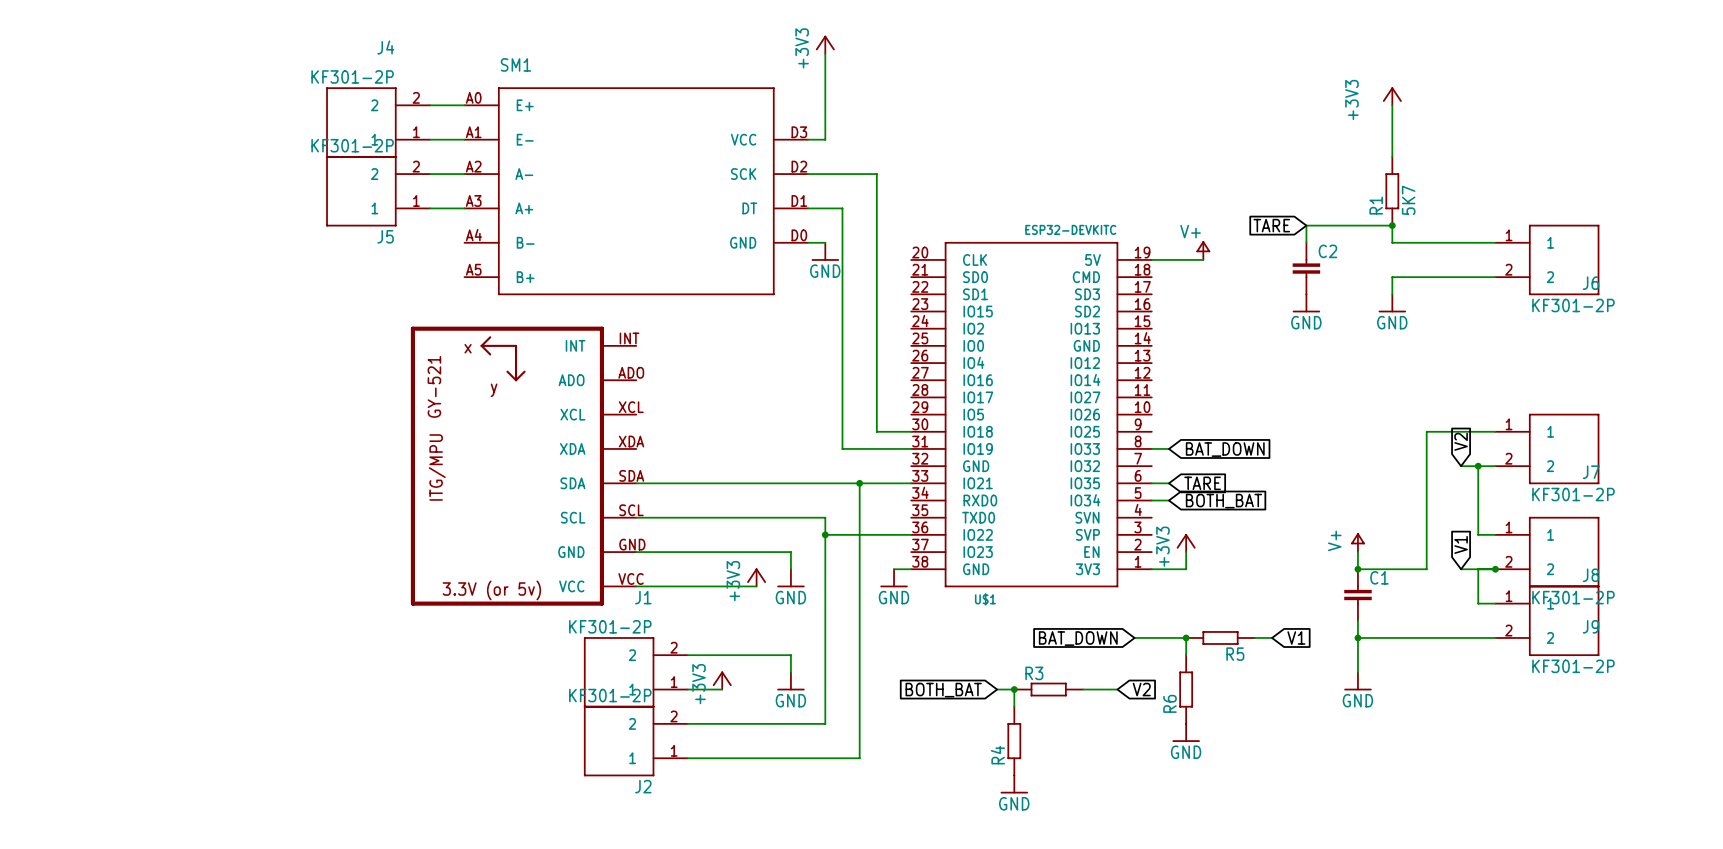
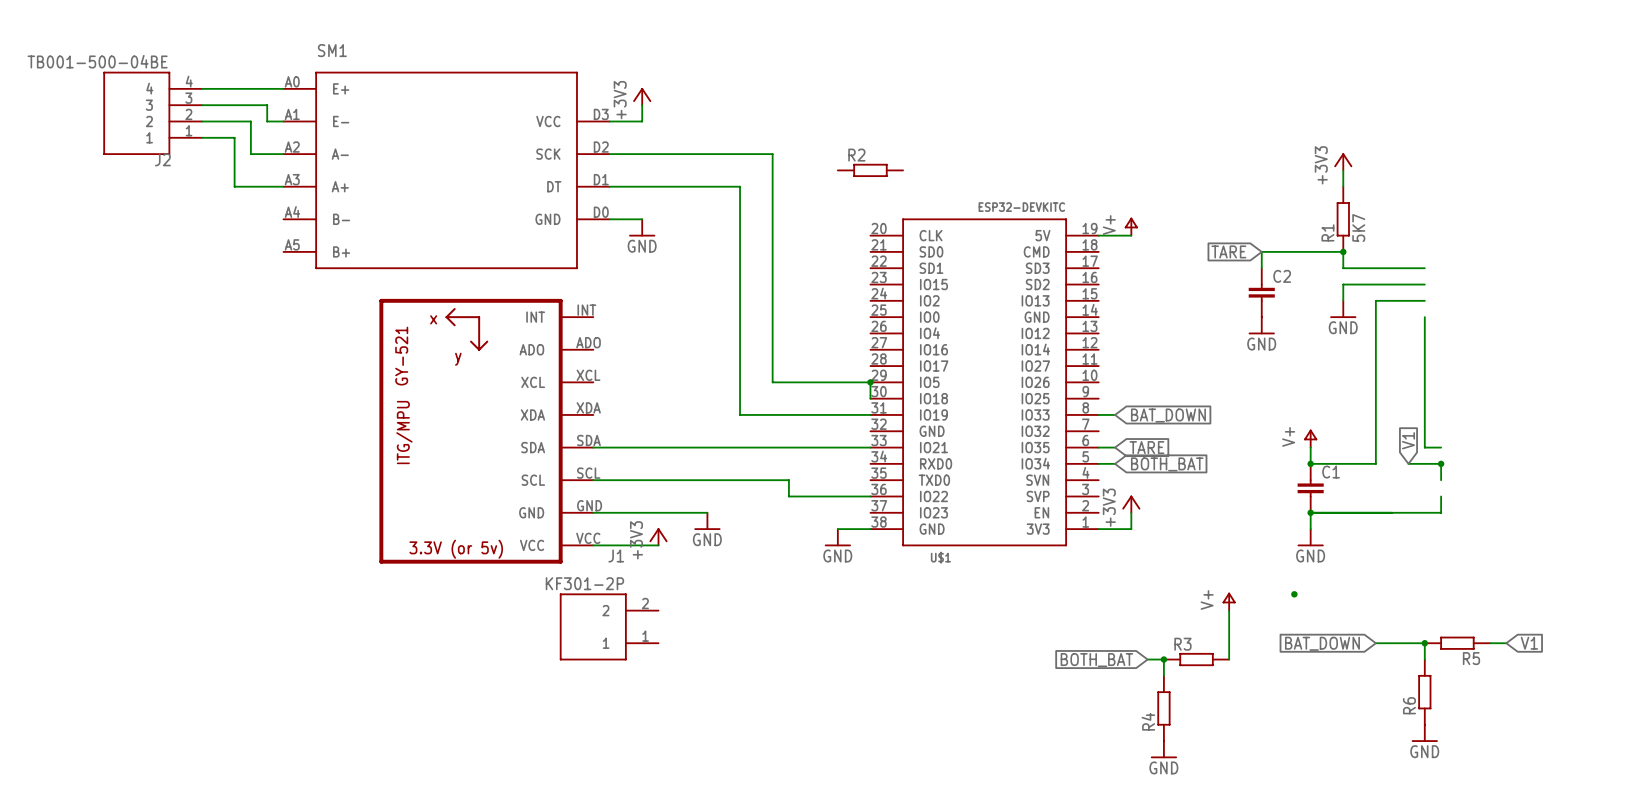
power symbol: +3V3 (825, 44) -> none
wire: (825, 53) (825, 139) (808, 139) -> none
power symbol position: +3V3 (1392, 96) -> +3V3 (1343, 161)
power symbol text position: +3V3 (1351, 99) -> +3V3 (1321, 165)
wire: none -> (201, 88) (283, 88)
wire: (430, 105) (464, 105) -> none
wire: (1392, 105) (1392, 156) -> none
power symbol: none -> +3V3 (642, 96)
wire: none -> (201, 105) (267, 105) (267, 121) (283, 121)
J4: KF301-2P (378, 122) -> none
wire: none -> (642, 105) (642, 121) (609, 121)
wire: none -> (201, 121) (250, 121) (250, 154) (283, 154)
wire: (430, 139) (464, 139) -> none
wire: none -> (201, 137) (234, 137) (234, 186) (283, 186)
wire: (430, 174) (464, 174) -> none
wire: (808, 174) (876, 174) (876, 431) (911, 431) -> (609, 154) (772, 154) (772, 382) (870, 382) (870, 398)
J5: KF301-2P (378, 191) -> none
SM1 position: (636, 191) -> (446, 170)
R2: none -> (870, 170)
R1 position: (1392, 191) -> (1343, 219)
wire: none -> (1343, 170) (1343, 186)
wire: (430, 208) (464, 208) -> none
wire: (808, 208) (842, 208) (842, 448) -> (609, 186) (740, 186) (740, 414) (805, 414)
global label position: TARE (1271, 225) -> TARE (1228, 251)
junction: (1392, 225) -> none
power symbol text rotation: 0° (1190, 231) -> 90° counterclockwise (1109, 225)
wire: none -> (609, 219) (642, 219)
wire: (808, 242) (825, 242) -> none
wire: (1306, 242) (1306, 225) (1392, 225) (1392, 242) (1495, 242) -> none
power symbol position: V+ (1203, 250) -> V+ (1131, 226)
power symbol position: GND (825, 251) -> GND (642, 227)
wire: (1186, 259) (1203, 259) -> none
J6: KF301-2P (1547, 259) -> none
C2 position: (1306, 268) -> (1261, 292)
wire: (1392, 277) (1392, 294) -> (1326, 251) (1261, 251) (1261, 268)
wire: (1409, 277) (1495, 277) -> (1343, 251) (1343, 268) (1424, 268)
junction: none -> (1343, 251)
power symbol: GND (1306, 303) -> none
power symbol position: GND (1392, 303) -> GND (1343, 309)
wire: none -> (1424, 284) (1343, 284) (1343, 300)
wire: none -> (1424, 300) (1375, 300) (1375, 463) (1310, 463) (1310, 447)
wire: none -> (1424, 317) (1424, 447) (1441, 447)
power symbol: none -> GND (1261, 325)
junction: none -> (870, 382)
wire: (1495, 431) (1426, 431) (1426, 569) (1357, 569) (1357, 552) -> none
global label: V2 (1461, 441) -> none
J7: KF301-2P (1547, 448) -> none
part position: (523, 466) -> (486, 431)
wire: (1461, 466) (1495, 466) -> none
wire: (1478, 466) (1478, 534) (1495, 534) -> none
junction: (1478, 466) -> none
power symbol: none -> V+ (1310, 438)
wire: (859, 483) (859, 758) (687, 758) -> none
junction: (859, 483) -> none
junction: none -> (1310, 463)
wire: none -> (1408, 463) (1441, 463) (1441, 480)
junction: none -> (1441, 463)
wire: (825, 534) (825, 723) (687, 723) -> none
junction: (825, 534) -> none
wire: none -> (1441, 496) (1441, 512) (1310, 512) (1310, 529)
power symbol: V+ (1357, 542) -> none
global label position: V1 (1461, 544) -> V1 (1408, 440)
wire: (739, 552) (790, 552) (790, 569) -> none
J8: KF301-2P (1547, 552) -> none
power symbol: none -> GND (707, 521)
wire: none -> (837, 529) (854, 529)
junction position: (1357, 569) -> (1310, 512)
wire: (1461, 569) (1495, 569) -> none
wire: (1478, 569) (1478, 603) (1495, 603) -> none
junction: (1495, 569) -> none
power symbol: none -> +3V3 (658, 536)
power symbol: +3V3 (756, 577) -> none
power symbol: GND (790, 578) -> none
power symbol position: GND (894, 578) -> GND (837, 537)
power symbol: none -> GND (1310, 537)
wire: (687, 586) (756, 586) -> none
C1 position: (1357, 595) -> (1310, 488)
wire: (1357, 620) (1357, 672) -> (1229, 610) (1229, 659)
J9: KF301-2P (1547, 620) -> none
wire: (1134, 637) (1186, 637) (1186, 655) -> none
junction: (1186, 637) -> none
R5 position: (1220, 637) -> (1457, 643)
wire: (1254, 637) (1272, 637) -> none
global label: V1 (1296, 637) -> none
wire: (1357, 637) (1495, 637) -> none
global label: BAT_DOWN (1078, 638) -> none
power symbol: none -> V+ (1229, 601)
wire: (687, 655) (790, 655) (790, 672) -> none
power symbol: +3V3 (722, 680) -> none
power symbol: GND (790, 681) -> none
power symbol: GND (1357, 681) -> none
wire: (687, 689) (722, 689) -> none
wire: (997, 689) (1014, 689) (1014, 706) -> none
junction: (1014, 689) -> none
R3 position: (1048, 689) -> (1196, 659)
wire: (1083, 689) (1117, 689) -> none
global label: V2 (1141, 689) -> none
R6 position: (1186, 689) -> (1424, 692)
wire: none -> (1375, 643) (1424, 643) (1424, 659)
junction: none -> (1424, 643)
wire: none -> (1490, 643) (1506, 643)
global label: none -> V1 (1529, 643)
global label: BOTH_BAT (943, 690) -> none
global label: none -> BAT_DOWN (1322, 643)
J2 value: KF301-2P (610, 695) -> TB001-500-04BE (97, 61)
J2 symbol: [583, 705, 688, 777] -> [103, 71, 202, 155]
wire: none -> (1147, 659) (1163, 659) (1163, 675)
junction: none -> (1163, 659)
global label: none -> BOTH_BAT (1096, 660)
power symbol position: GND (1186, 732) -> GND (1163, 749)
R4 position: (1014, 741) -> (1163, 708)
power symbol: GND (1014, 784) -> none
power symbol: none -> GND (1424, 733)

